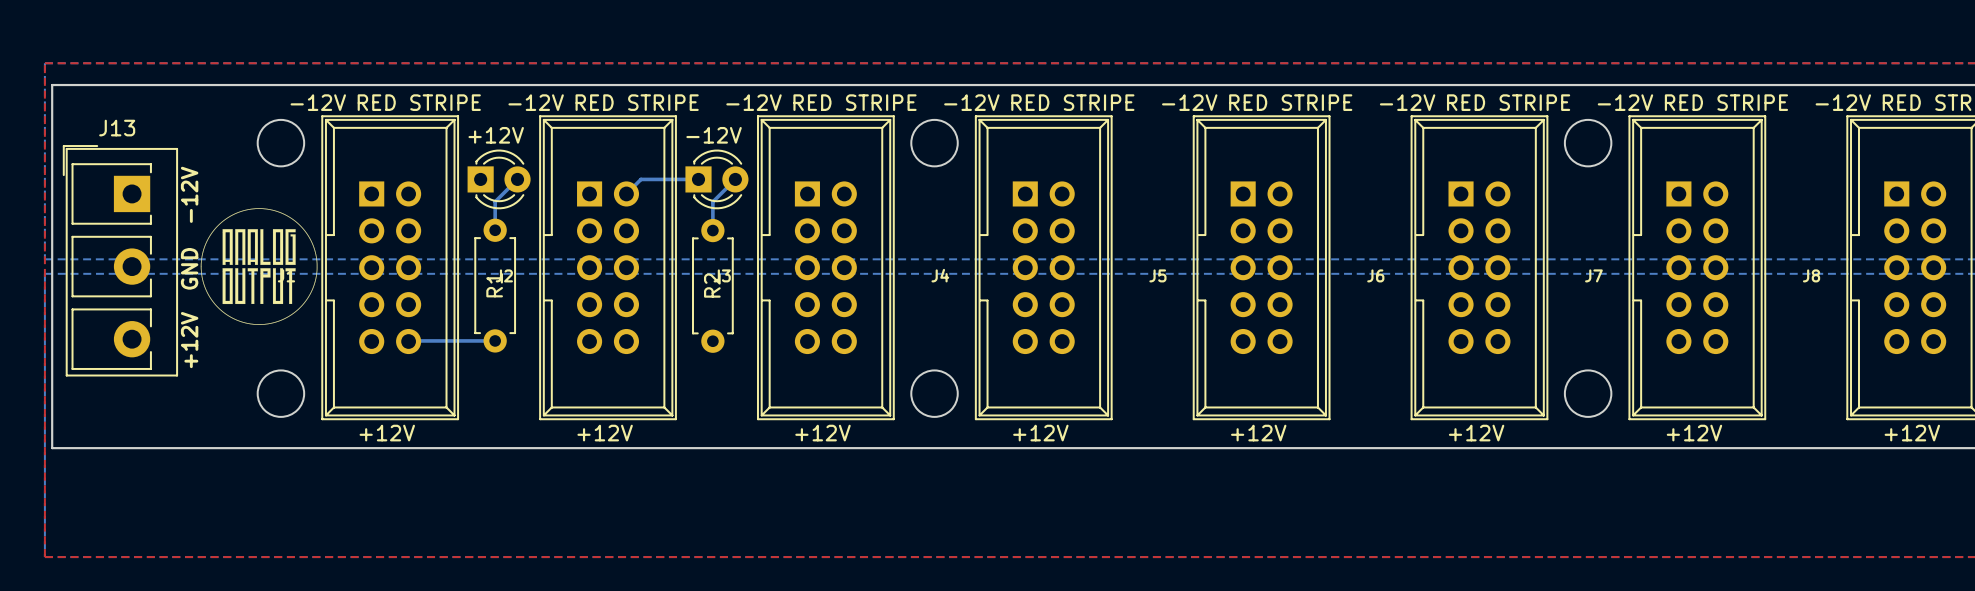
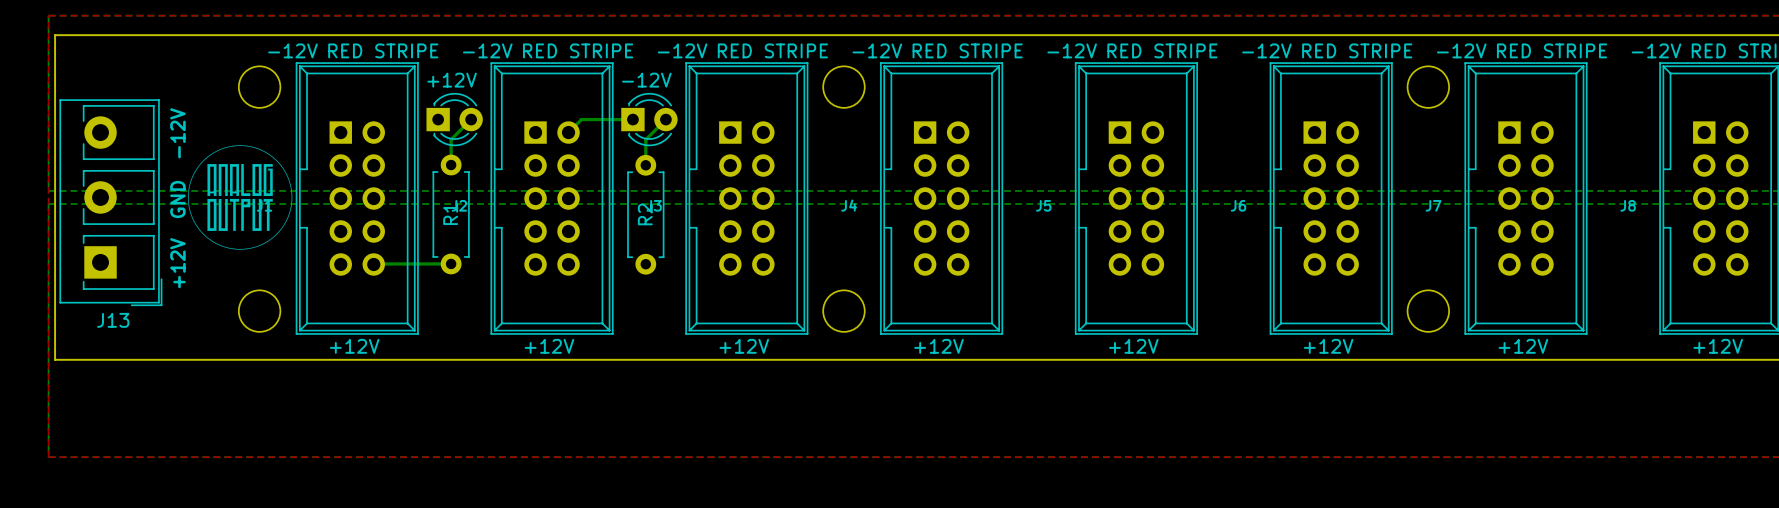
J13 rotation: 0° (120, 260) -> 180° (110, 202)

